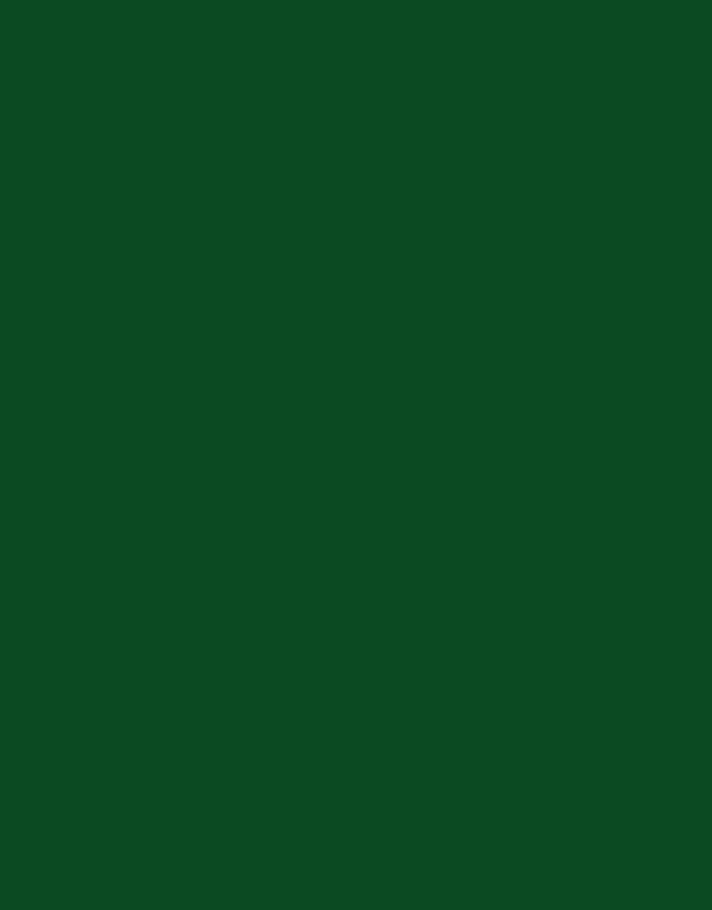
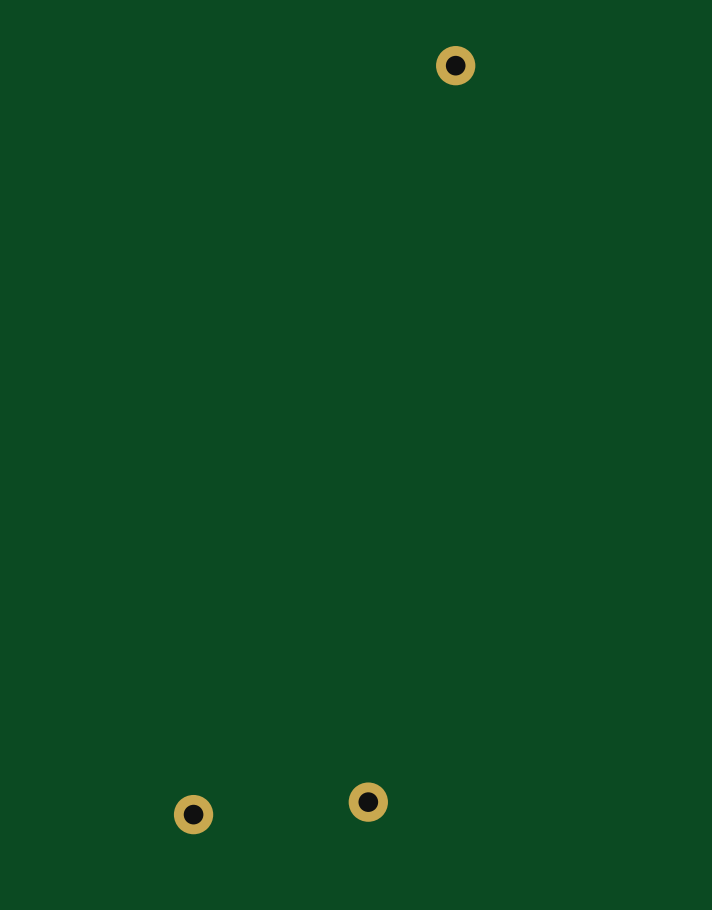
via: none -> (455, 65)
via: none -> (368, 802)
via: none -> (193, 814)

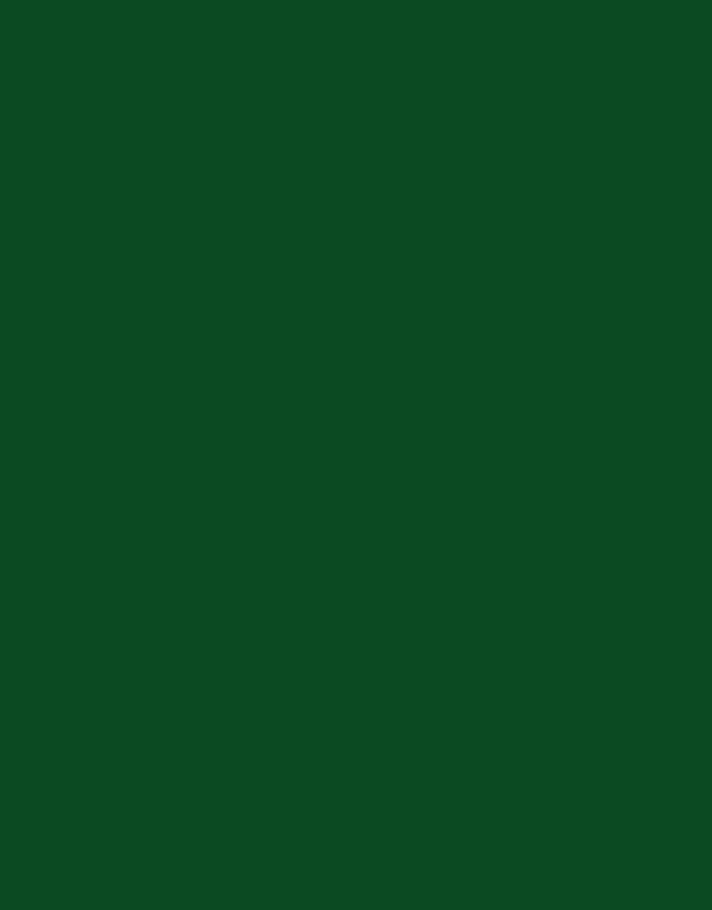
via: (455, 65) -> none
via: (368, 802) -> none
via: (193, 814) -> none

